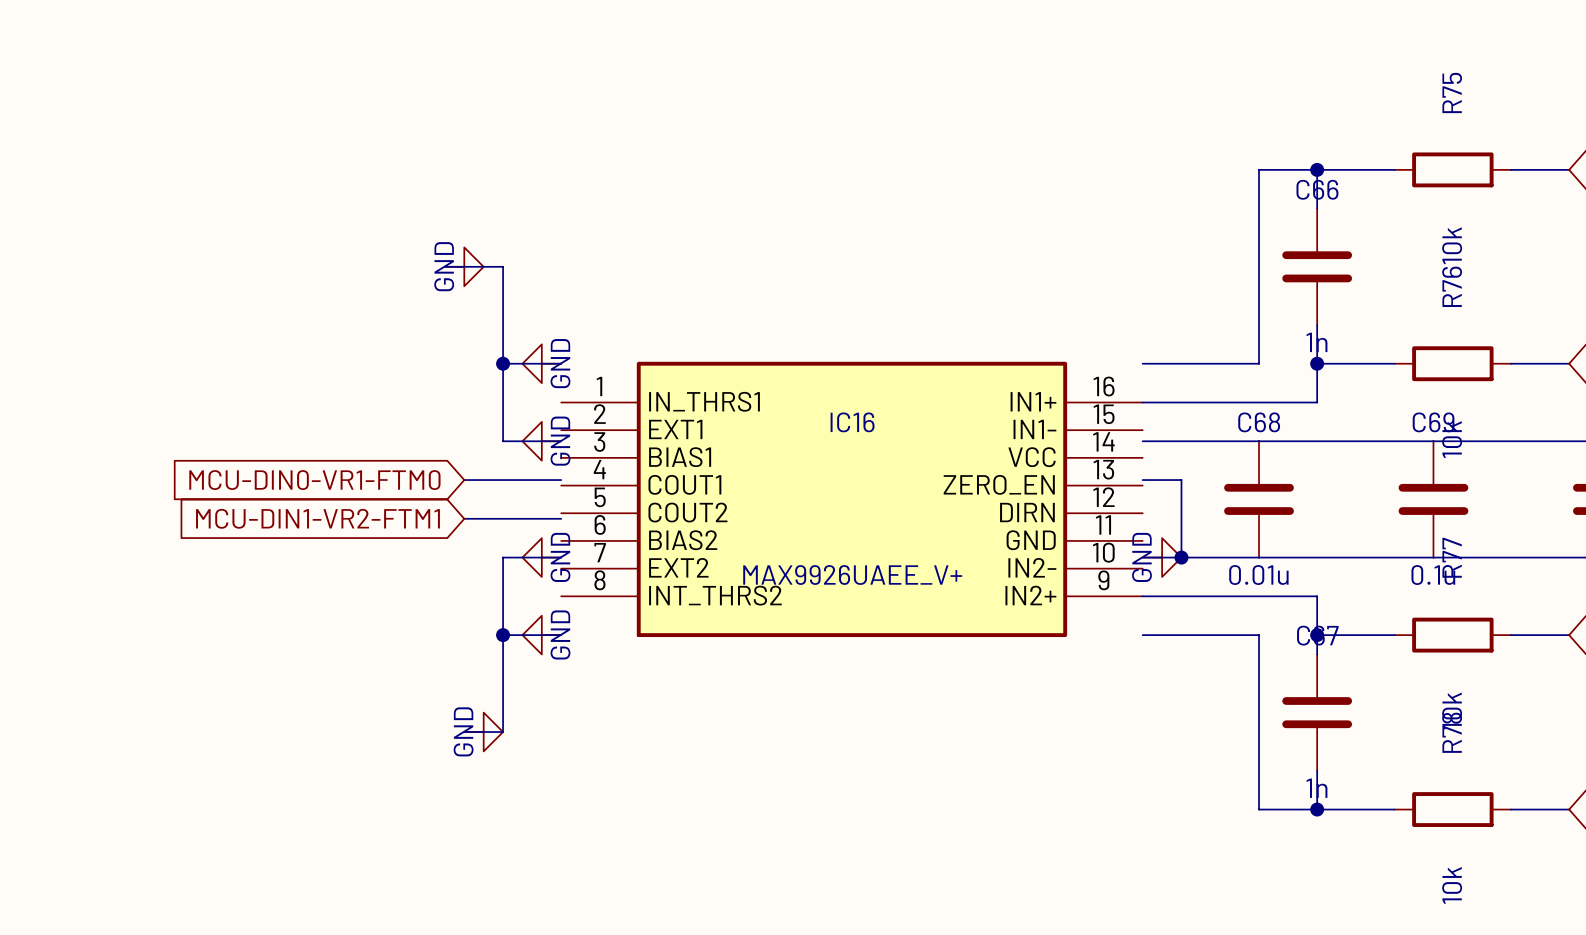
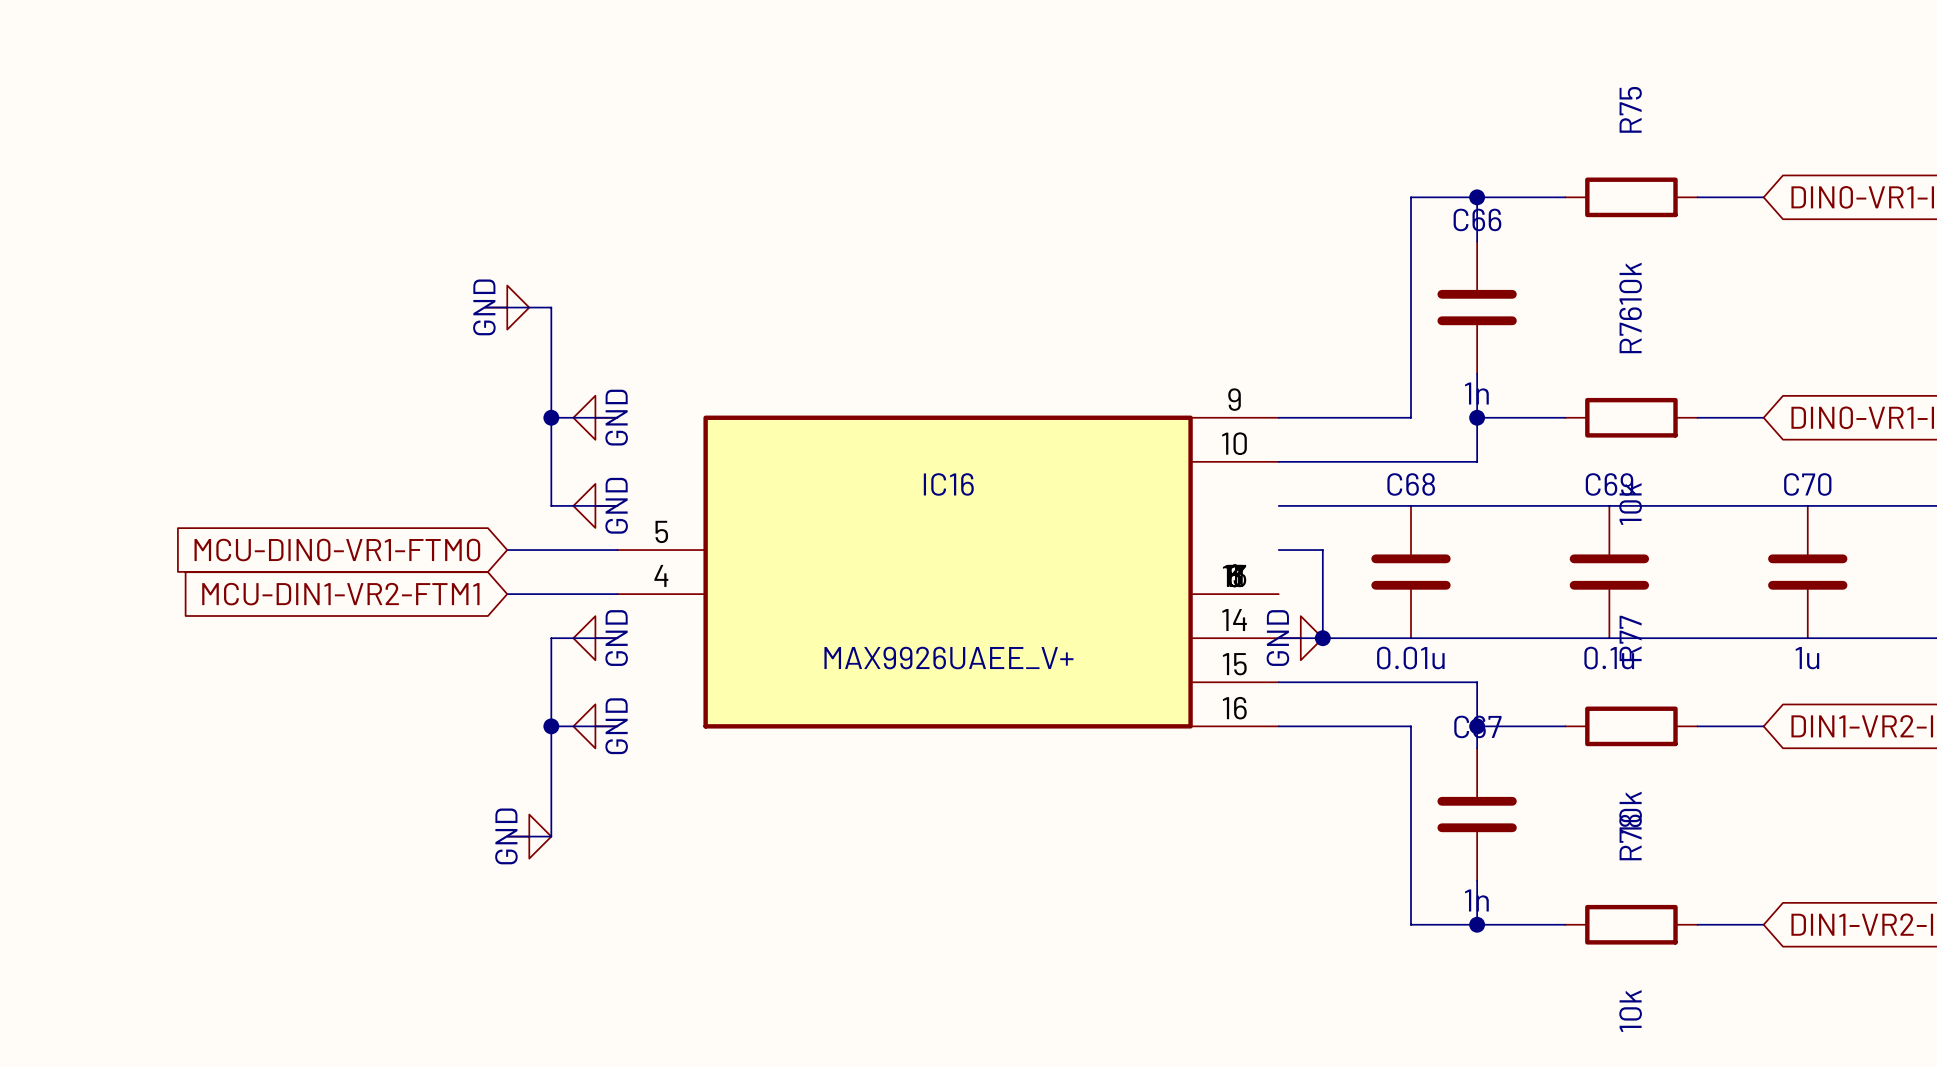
IC16 symbol: [561, 361, 1143, 638] -> [617, 415, 1279, 729]

